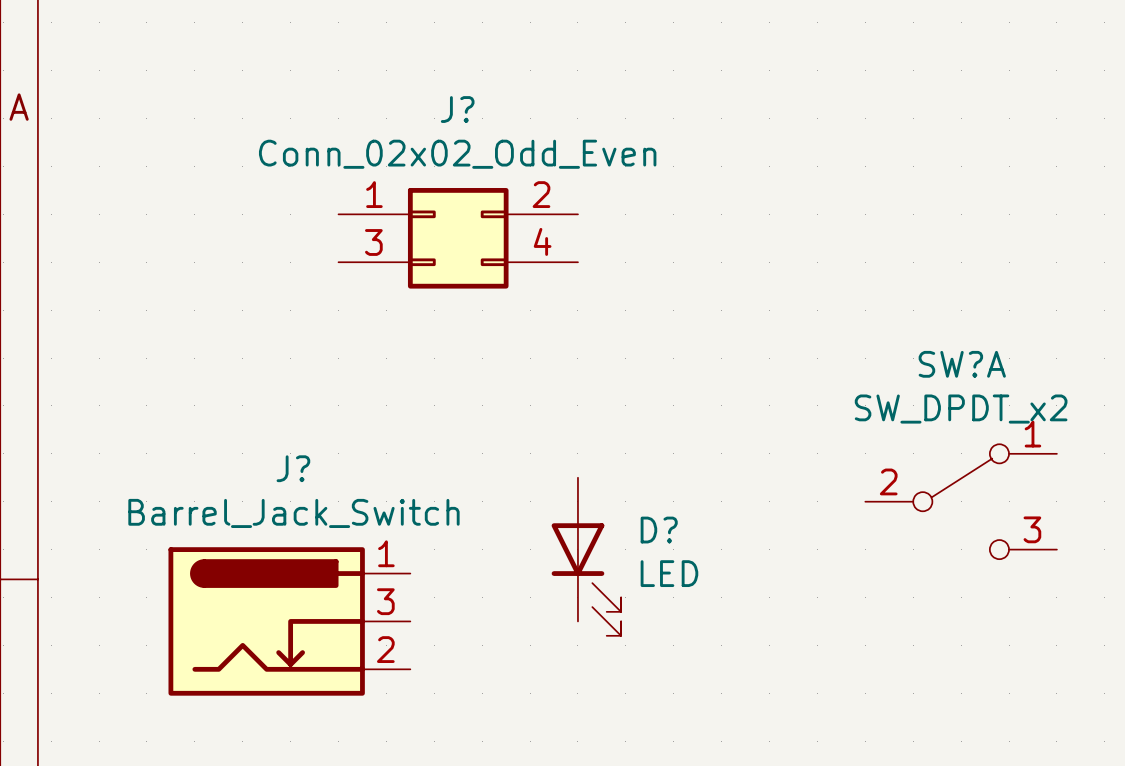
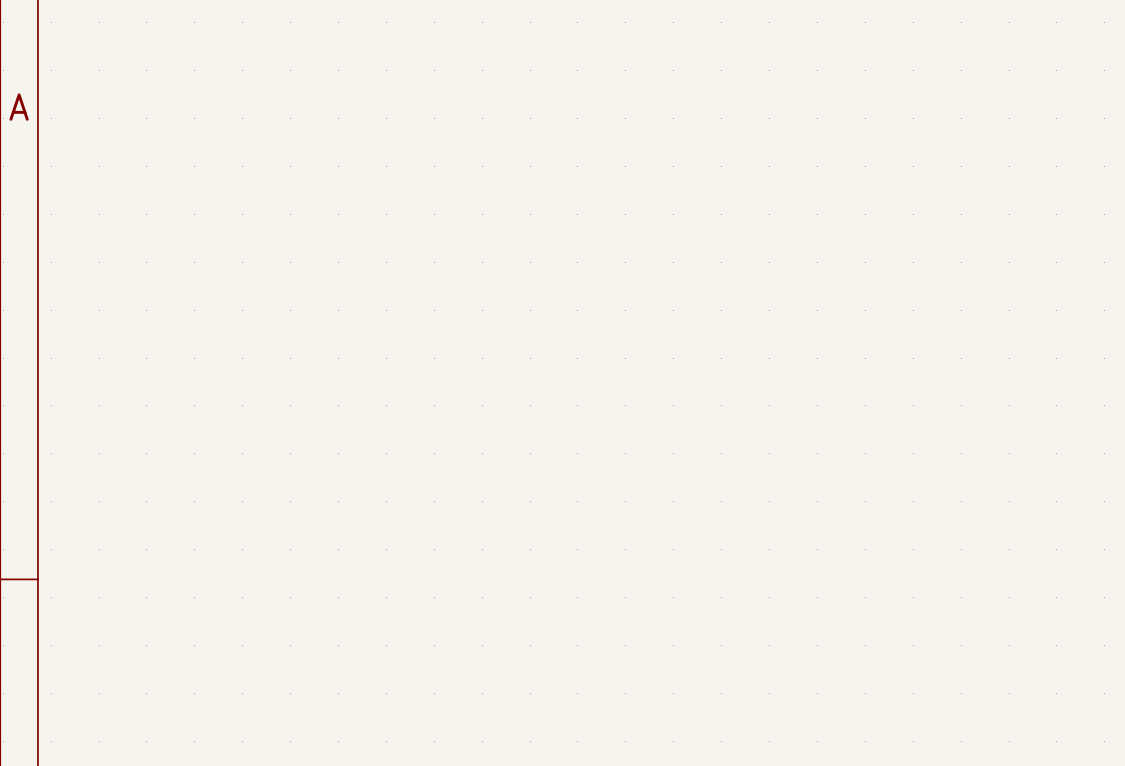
J?: Conn_02x02_Odd_Even (458, 238) -> none
SW?A: SW_DPDT_x2 (961, 501) -> none
D?: LED (586, 556) -> none
J?: Barrel_Jack_Switch (289, 621) -> none

